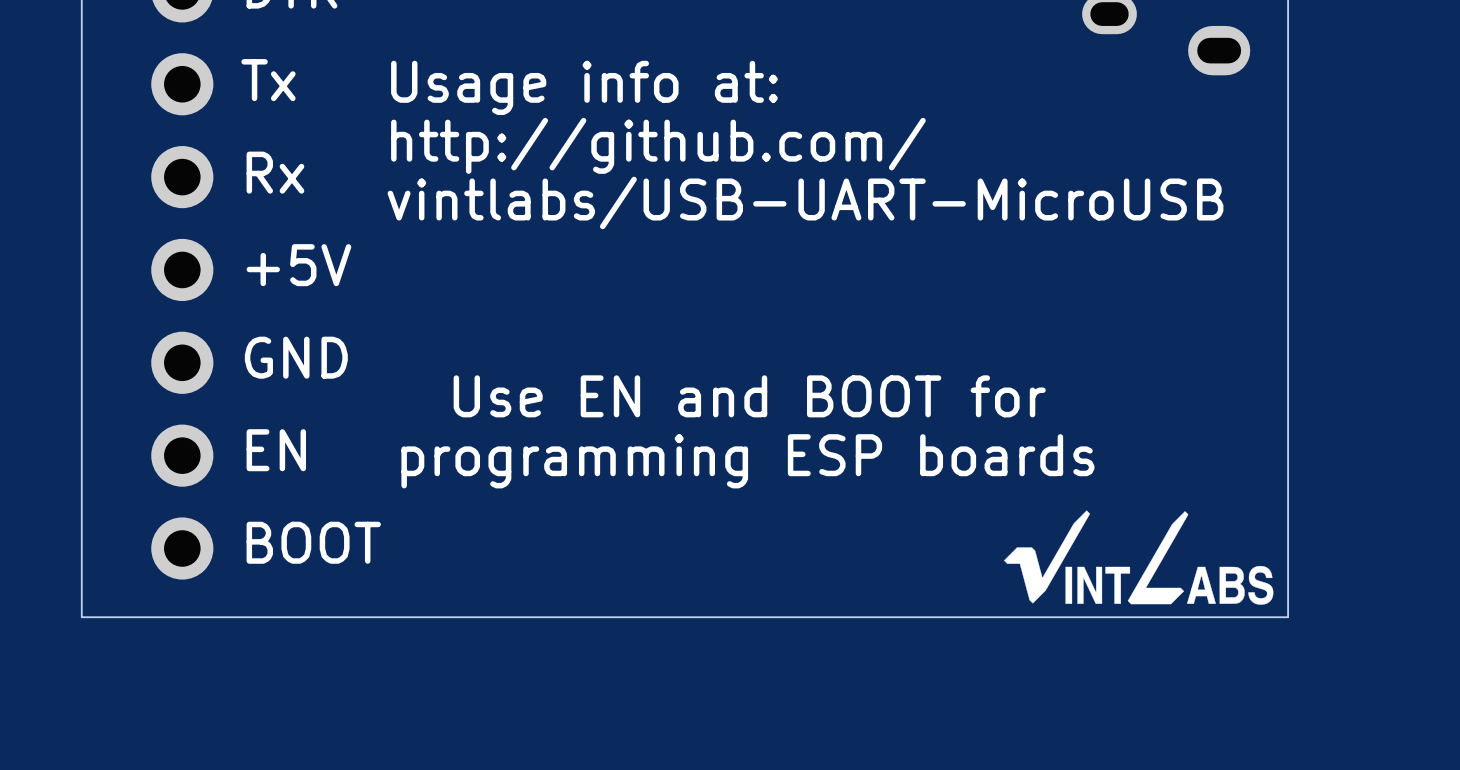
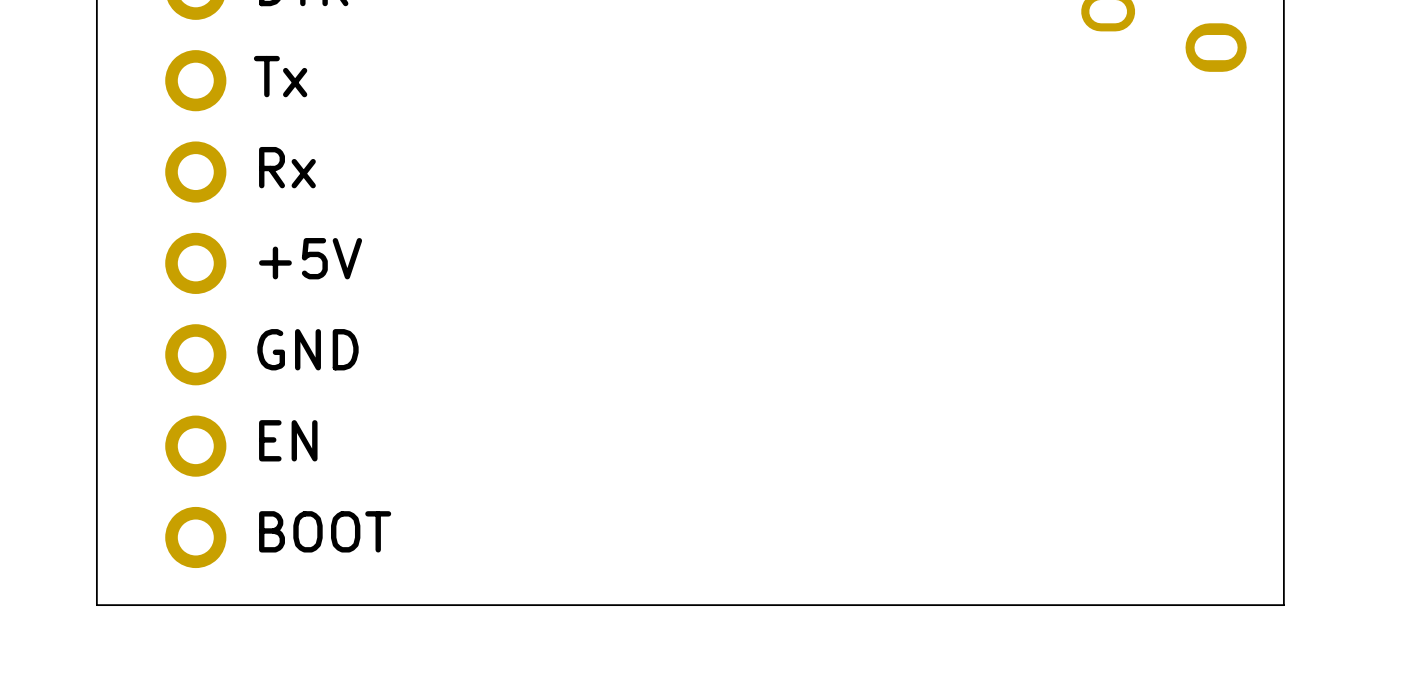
text: Usage info at: (584, 87) -> none
text: http://github.com/ (658, 145) -> none
text: vintlabs/USB-UART-MicroUSB (805, 202) -> none
text: Use EN and BOOT for (749, 396) -> none
text: programming ESP boards (747, 461) -> none
drawing: [1004, 510, 1274, 605] -> none

